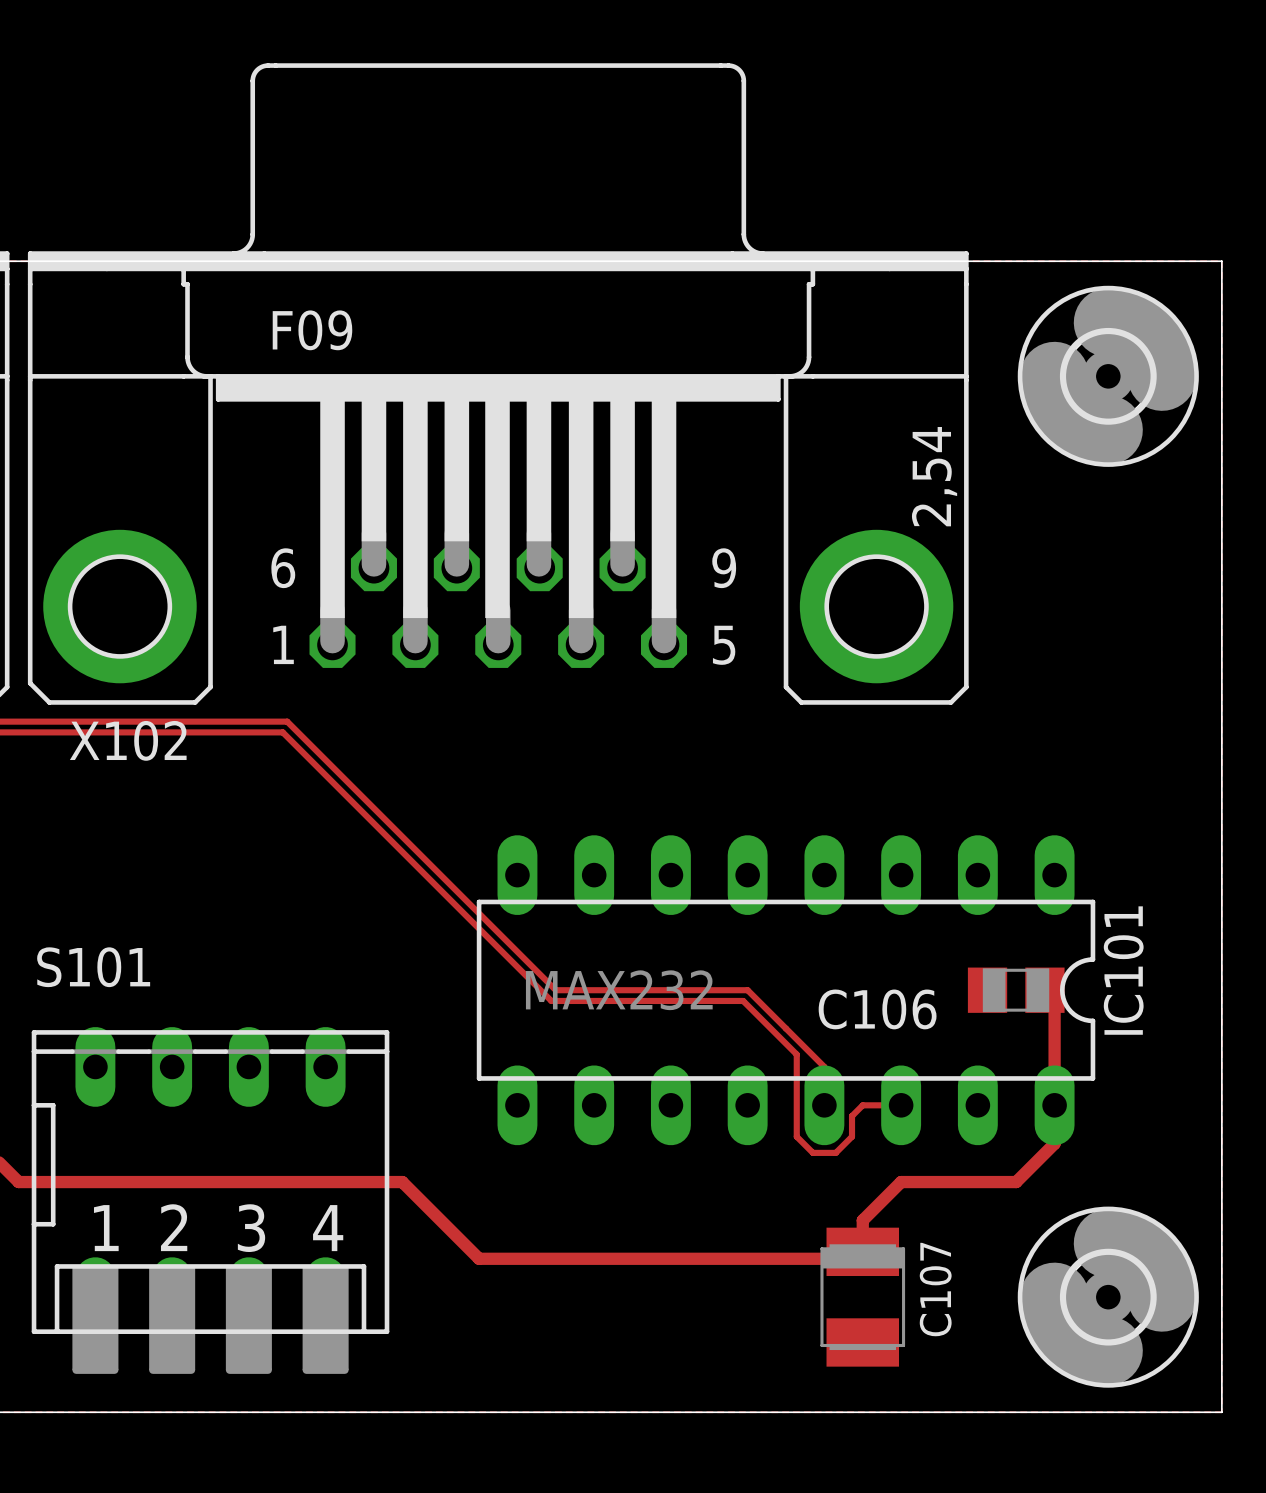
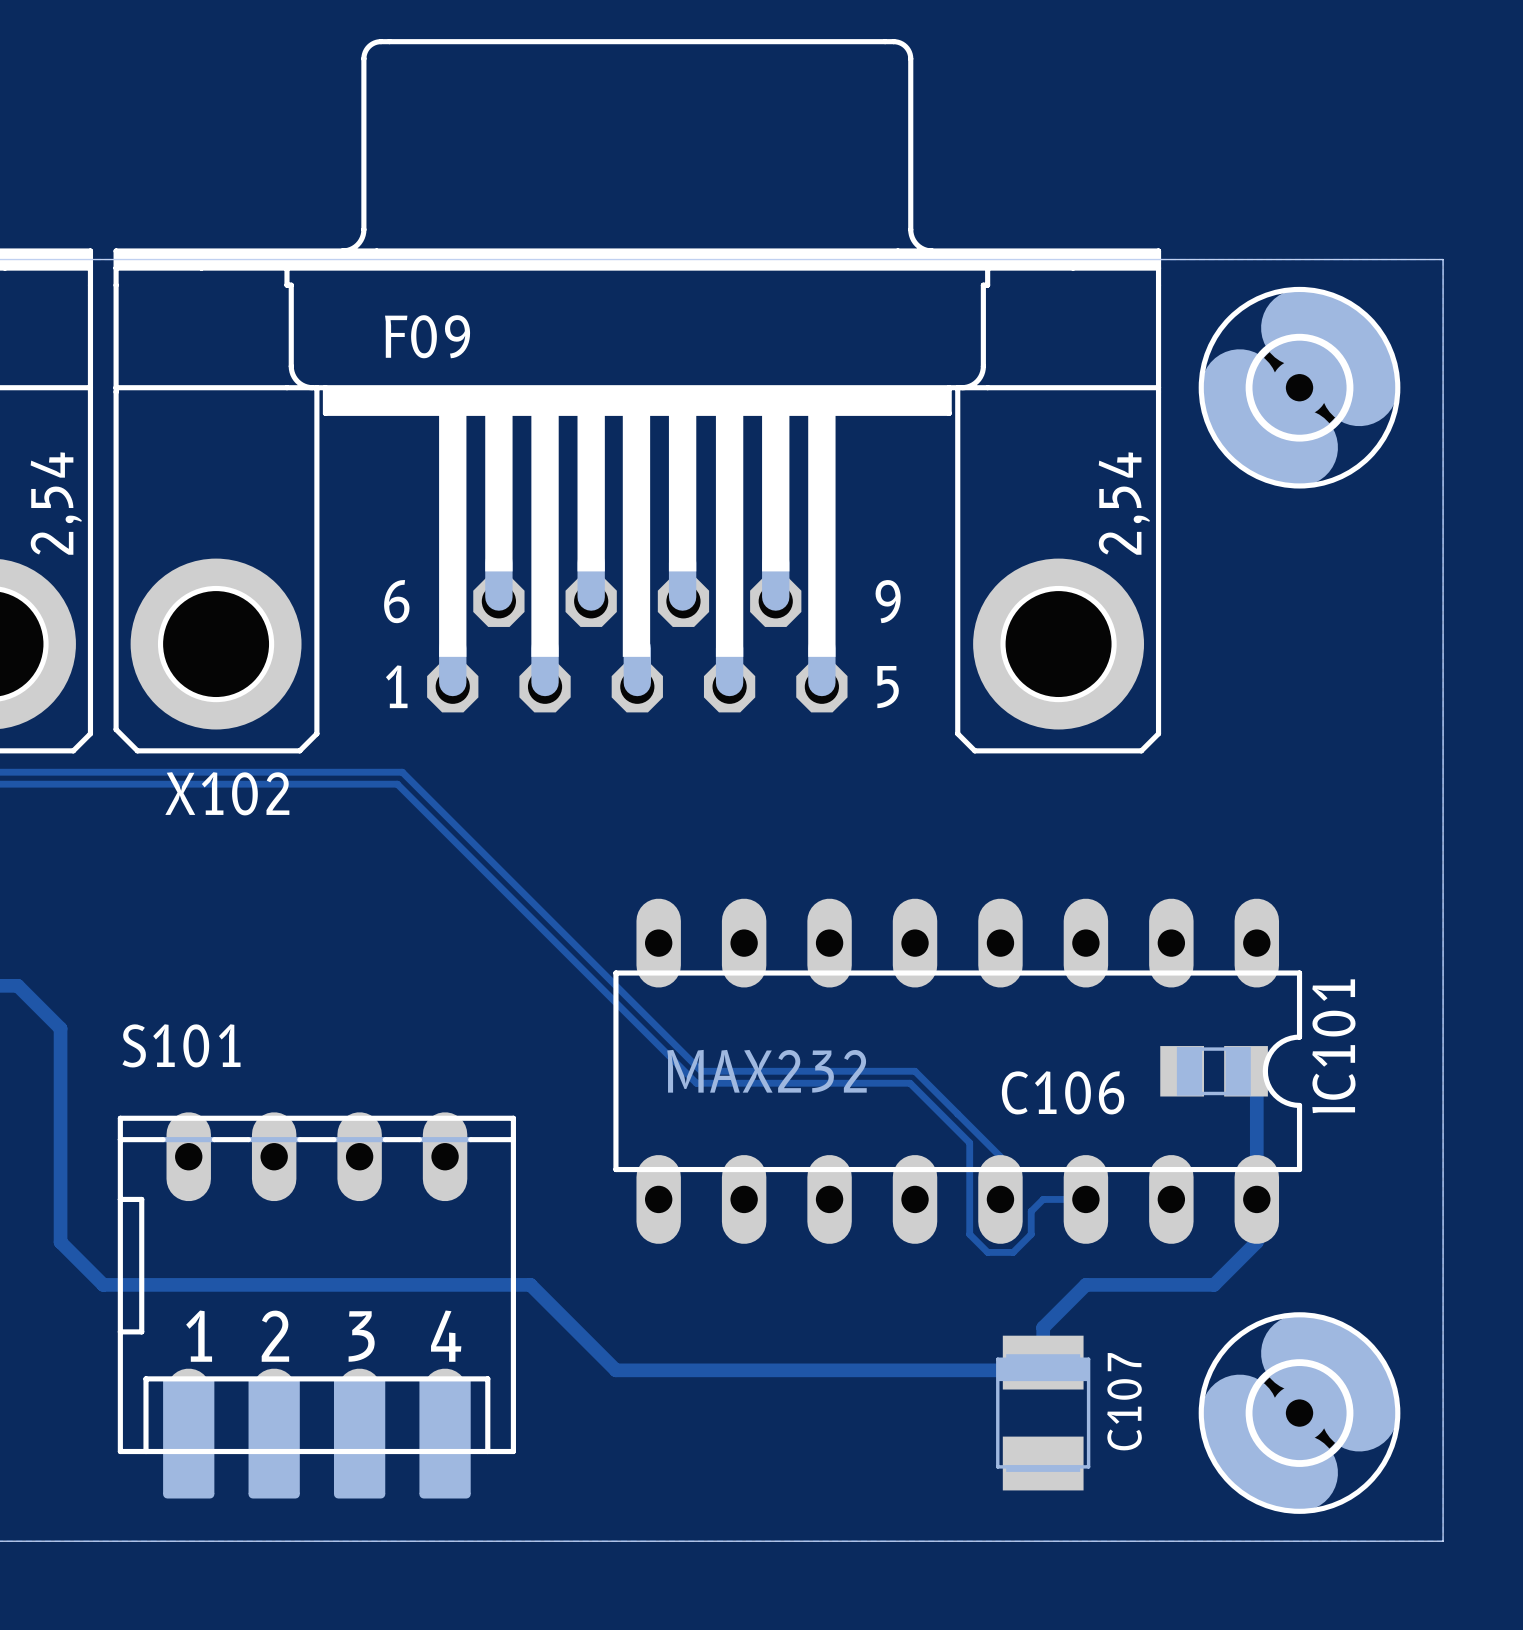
part position: (1108, 376) -> (1299, 387)
part position: (1108, 1297) -> (1299, 1413)

